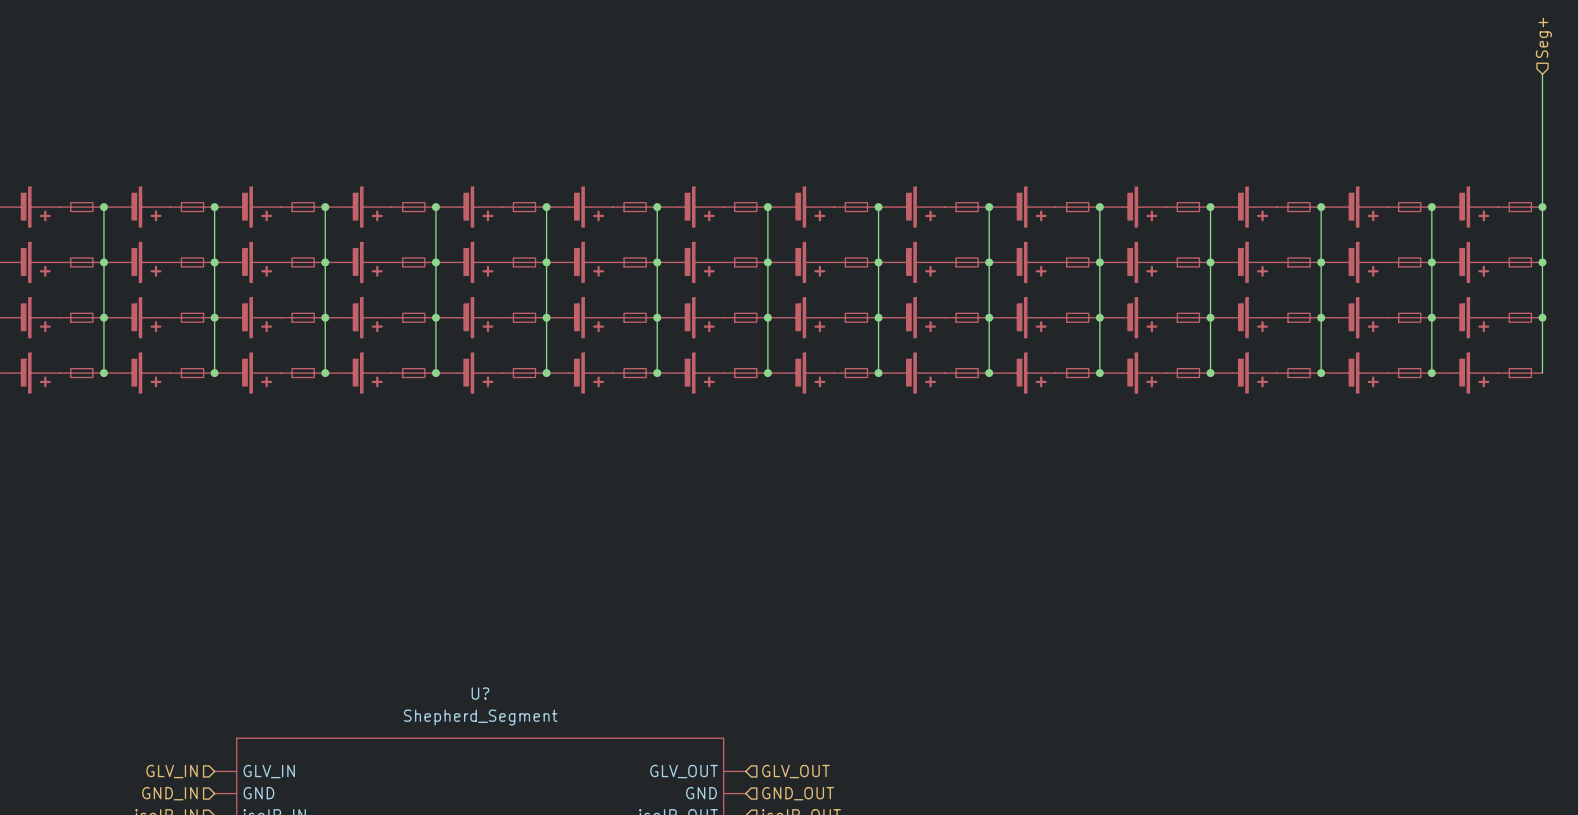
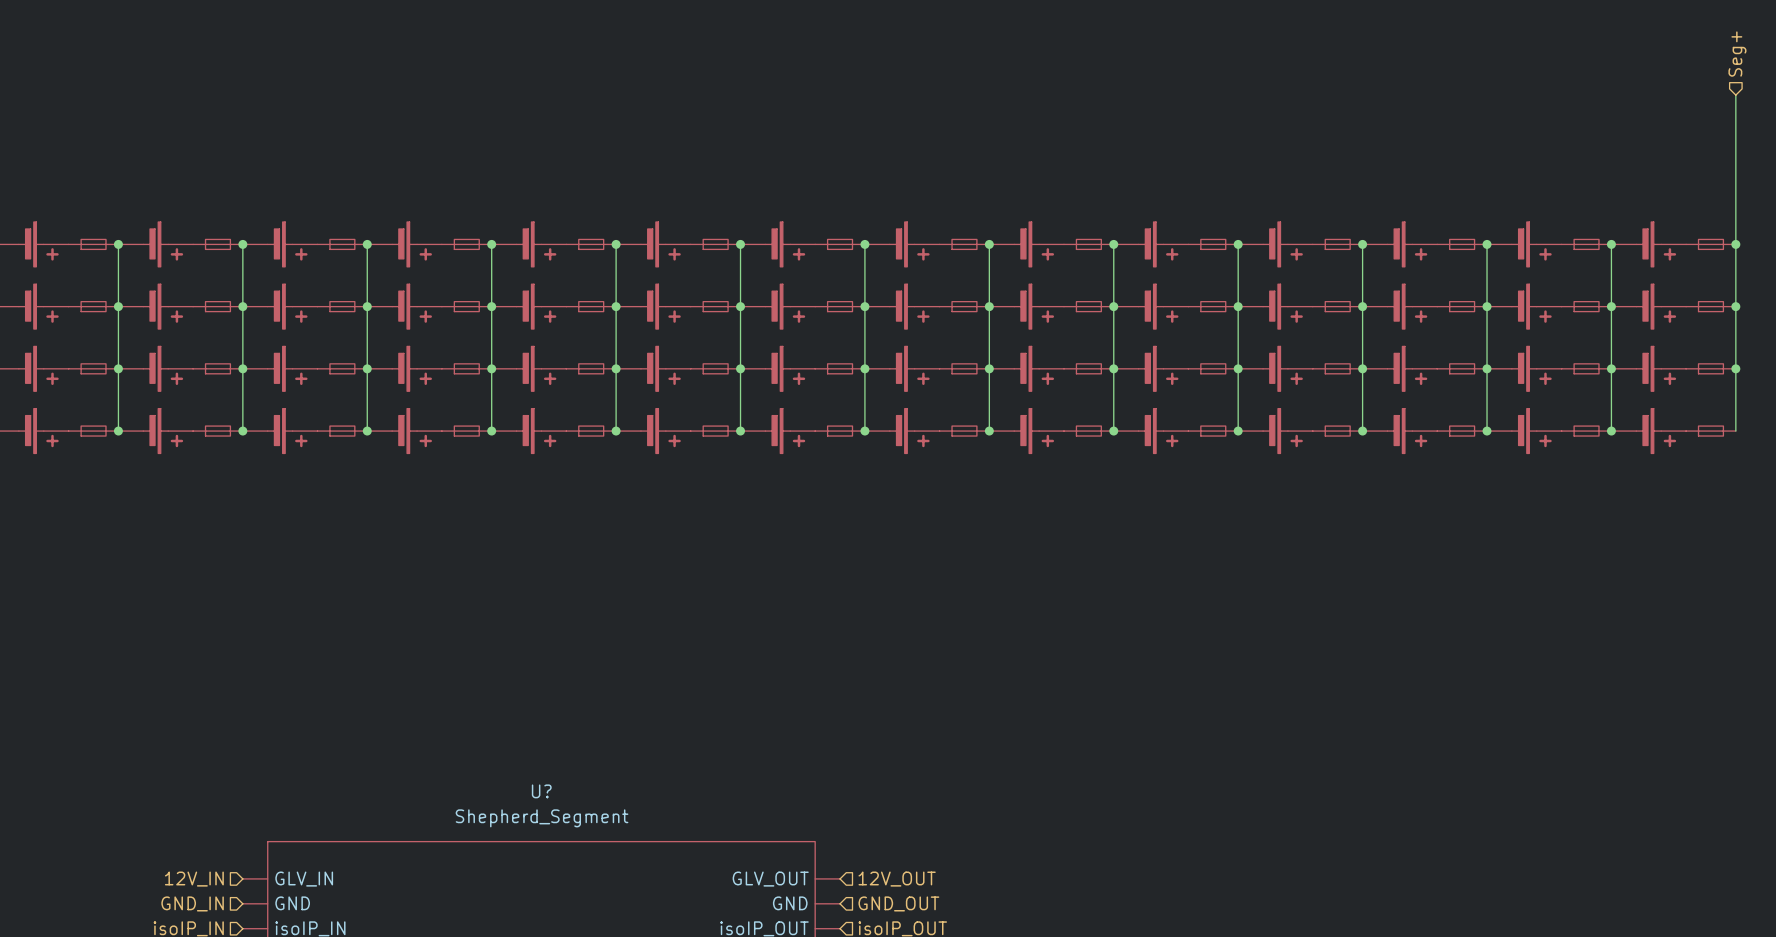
hierarchical label: GLV_IN (172, 771) -> 12V_IN (194, 879)
hierarchical label: GLV_OUT (796, 771) -> 12V_OUT (897, 879)

